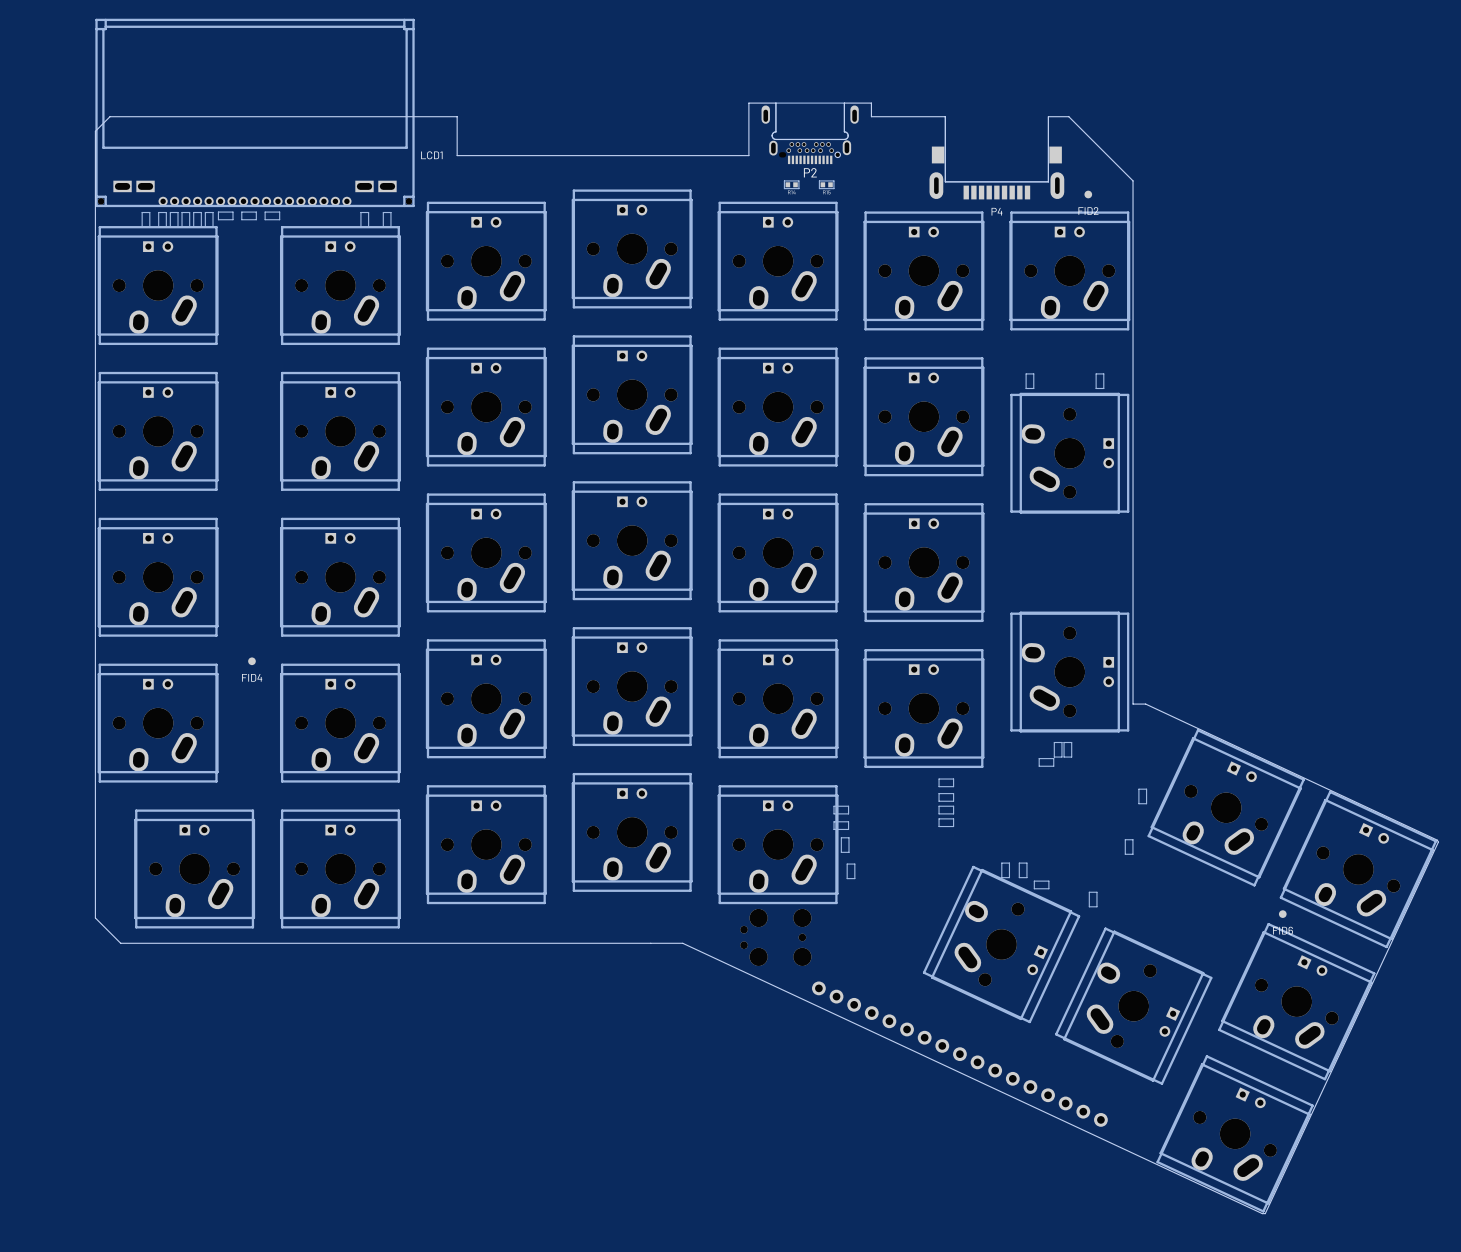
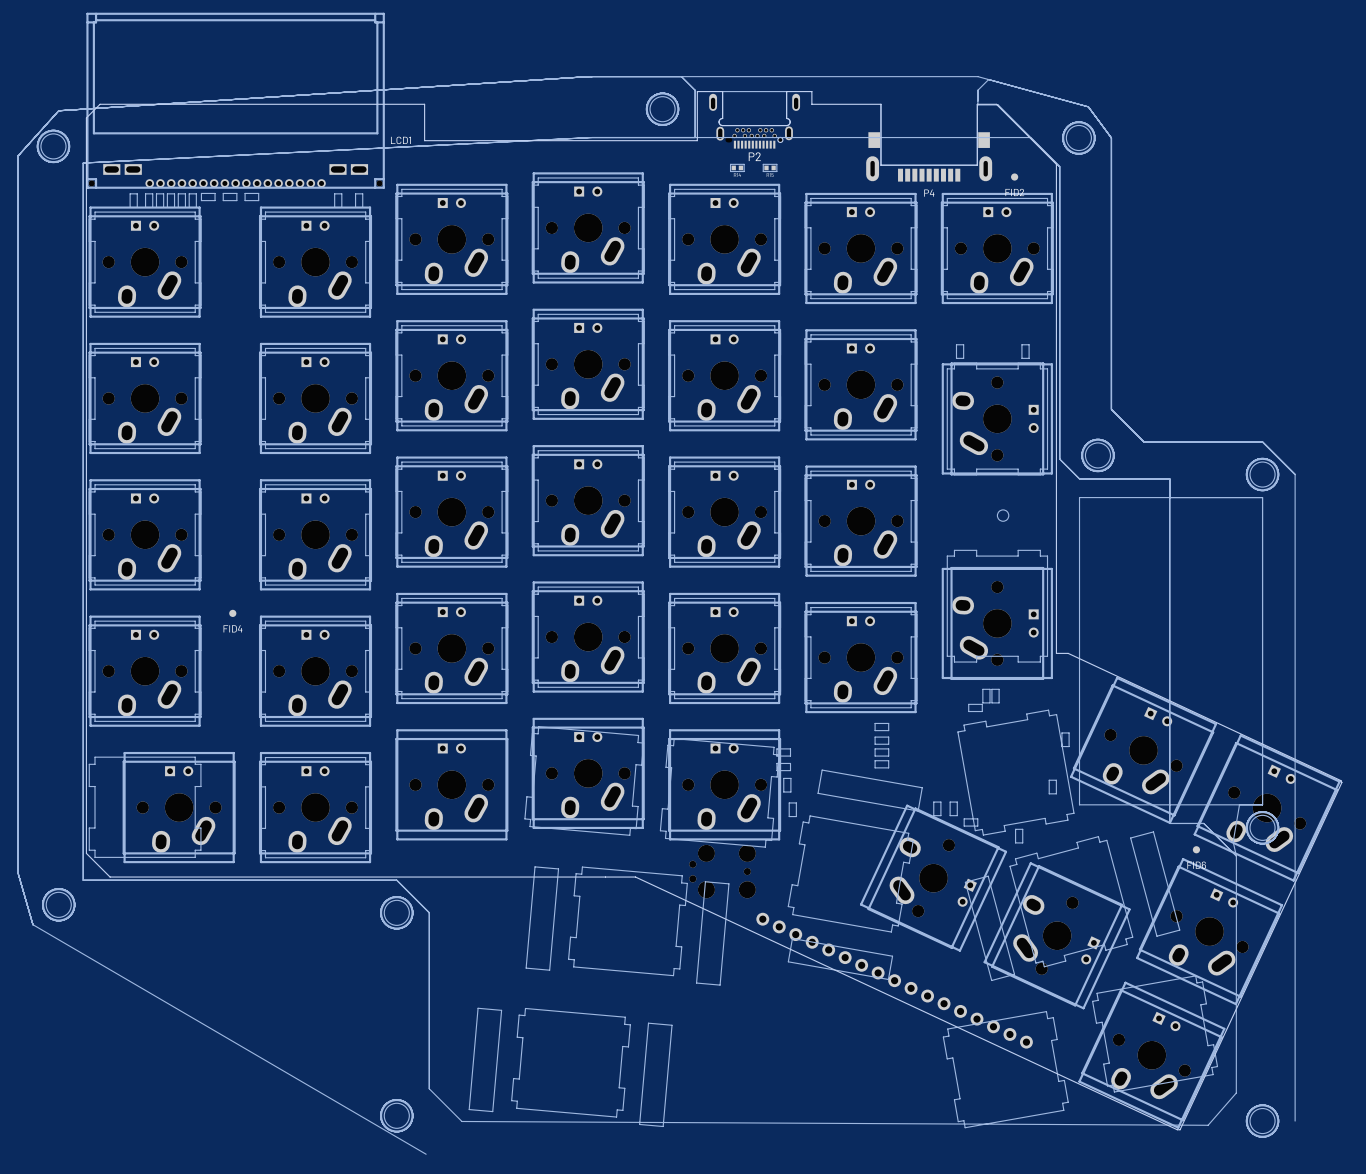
line: none -> (681, 76) (695, 90) (695, 137)
line: none -> (988, 79) (977, 90)
line: none -> (977, 90) (977, 101)
line: none -> (977, 90) (977, 104) (997, 104) (1059, 166) (1059, 459) (1079, 478) (1169, 478) (1169, 823) (1203, 823) (1236, 856)
drawing: none -> [646, 92, 680, 126]
drawing: none -> [1062, 121, 1096, 155]
drawing: none -> [37, 129, 70, 163]
line: none -> (1030, 137) (591, 137) (83, 163) (83, 880) (396, 880) (429, 912) (429, 1088) (461, 1121) (1208, 1125) (1236, 1093) (1236, 856)
line: none -> (538, 177) (538, 185) (532, 185) (532, 207) (538, 207) (538, 248) (532, 248) (532, 271) (538, 271) (538, 278) (638, 278) (638, 271) (644, 271) (644, 248) (638, 248) (638, 207) (644, 207) (644, 185) (638, 185) (638, 177) (538, 177)
line: none -> (401, 189) (502, 189) (502, 196) (507, 196) (507, 218) (502, 218) (502, 260) (507, 260) (507, 282) (502, 282) (502, 289) (401, 289) (401, 282) (396, 282) (396, 260) (401, 260) (401, 218) (396, 218) (396, 196) (401, 196) (401, 189)
line: none -> (674, 189) (674, 196) (668, 196) (668, 218) (674, 218) (674, 260) (668, 260) (668, 282) (674, 282) (674, 289) (774, 289) (774, 282) (780, 282) (780, 260) (774, 260) (774, 218) (780, 218) (780, 196) (774, 196) (774, 189) (674, 189)
line: none -> (810, 198) (911, 198) (911, 205) (916, 205) (916, 227) (911, 227) (911, 269) (916, 269) (916, 291) (911, 291) (911, 298) (810, 298) (810, 291) (805, 291) (805, 269) (810, 269) (810, 227) (805, 227) (805, 205) (810, 205) (810, 198)
line: none -> (947, 198) (1047, 198) (1047, 205) (1053, 205) (1053, 227) (1047, 227) (1047, 269) (1053, 269) (1053, 291) (1047, 291) (1047, 298) (947, 298) (947, 291) (941, 291) (941, 269) (947, 269) (947, 227) (941, 227) (941, 205) (947, 205) (947, 198)
line: none -> (95, 212) (95, 219) (89, 219) (89, 241) (95, 241) (95, 282) (89, 282) (89, 305) (95, 305) (95, 312) (195, 312) (195, 305) (200, 305) (200, 282) (195, 282) (195, 241) (200, 241) (200, 219) (195, 219) (195, 212) (95, 212)
line: none -> (265, 212) (265, 219) (259, 219) (259, 241) (265, 241) (265, 282) (259, 282) (259, 305) (265, 305) (265, 312) (365, 312) (365, 305) (371, 305) (371, 282) (365, 282) (365, 241) (371, 241) (371, 219) (365, 219) (365, 212) (265, 212)
line: none -> (538, 314) (538, 321) (532, 321) (532, 343) (538, 343) (538, 385) (532, 385) (532, 407) (538, 407) (538, 414) (638, 414) (638, 407) (644, 407) (644, 385) (638, 385) (638, 343) (644, 343) (644, 321) (638, 321) (638, 314) (538, 314)
line: none -> (401, 325) (502, 325) (502, 332) (507, 332) (507, 355) (502, 355) (502, 396) (507, 396) (507, 418) (502, 418) (502, 425) (401, 425) (401, 418) (396, 418) (396, 396) (401, 396) (401, 355) (396, 355) (396, 332) (401, 332) (401, 325)
line: none -> (674, 325) (674, 332) (668, 332) (668, 355) (674, 355) (674, 396) (668, 396) (668, 418) (674, 418) (674, 425) (774, 425) (774, 418) (780, 418) (780, 396) (774, 396) (774, 355) (780, 355) (780, 332) (774, 332) (774, 325) (674, 325)
line: none -> (810, 334) (810, 341) (805, 341) (805, 364) (810, 364) (810, 405) (805, 405) (805, 427) (810, 427) (810, 435) (911, 435) (911, 427) (916, 427) (916, 405) (911, 405) (911, 364) (916, 364) (916, 341) (911, 341) (911, 334) (810, 334)
line: none -> (95, 348) (95, 355) (89, 355) (89, 377) (95, 377) (95, 419) (89, 419) (89, 441) (95, 441) (95, 448) (195, 448) (195, 441) (200, 441) (200, 419) (195, 419) (195, 377) (200, 377) (200, 355) (195, 355) (195, 348) (95, 348)
line: none -> (265, 348) (265, 355) (259, 355) (259, 377) (265, 377) (265, 419) (259, 419) (259, 441) (265, 441) (265, 448) (365, 448) (365, 441) (371, 441) (371, 419) (365, 419) (365, 377) (371, 377) (371, 355) (365, 355) (365, 348) (265, 348)
line: none -> (954, 363) (954, 368) (947, 368) (947, 469) (954, 469) (954, 474) (976, 474) (976, 469) (1018, 469) (1018, 474) (1040, 474) (1040, 469) (1047, 469) (1047, 368) (1040, 368) (1040, 363) (1018, 363) (1018, 368) (976, 368) (976, 363) (954, 363)
drawing: none -> [1081, 438, 1115, 472]
line: none -> (538, 450) (538, 457) (532, 457) (532, 480) (538, 480) (538, 521) (532, 521) (532, 543) (538, 543) (538, 550) (638, 550) (638, 543) (644, 543) (644, 521) (638, 521) (638, 480) (644, 480) (644, 457) (638, 457) (638, 450) (538, 450)
drawing: none -> [1246, 458, 1280, 492]
line: none -> (401, 462) (502, 462) (502, 469) (507, 469) (507, 491) (502, 491) (502, 532) (507, 532) (507, 555) (502, 555) (502, 562) (401, 562) (401, 555) (396, 555) (396, 532) (401, 532) (401, 491) (396, 491) (396, 469) (401, 469) (401, 462)
line: none -> (674, 462) (674, 469) (668, 469) (668, 491) (674, 491) (674, 532) (668, 532) (668, 555) (674, 555) (674, 562) (774, 562) (774, 555) (780, 555) (780, 532) (774, 532) (774, 491) (780, 491) (780, 469) (774, 469) (774, 462) (674, 462)
line: none -> (810, 471) (810, 478) (805, 478) (805, 500) (810, 500) (810, 542) (805, 542) (805, 564) (810, 564) (810, 571) (911, 571) (911, 564) (916, 564) (916, 542) (911, 542) (911, 500) (916, 500) (916, 478) (911, 478) (911, 471) (810, 471)
line: none -> (95, 484) (95, 491) (89, 491) (89, 514) (95, 514) (95, 555) (89, 555) (89, 577) (95, 577) (95, 585) (195, 585) (195, 577) (200, 577) (200, 555) (195, 555) (195, 514) (200, 514) (200, 491) (195, 491) (195, 484) (95, 484)
line: none -> (265, 484) (265, 491) (259, 491) (259, 514) (265, 514) (265, 555) (259, 555) (259, 577) (265, 577) (265, 585) (365, 585) (365, 577) (371, 577) (371, 555) (365, 555) (365, 514) (371, 514) (371, 491) (365, 491) (365, 484) (265, 484)
line: none -> (1079, 497) (1079, 804) (1262, 804) (1262, 497) (1079, 497)
drawing: none -> [997, 509, 1010, 522]
line: none -> (954, 550) (954, 556) (947, 556) (947, 656) (954, 656) (954, 662) (976, 662) (976, 656) (1018, 656) (1018, 662) (1040, 662) (1040, 656) (1047, 656) (1047, 556) (1040, 556) (1040, 550) (1018, 550) (1018, 556) (976, 556) (976, 550) (954, 550)
line: none -> (538, 587) (538, 594) (532, 594) (532, 616) (538, 616) (538, 657) (532, 657) (532, 680) (538, 680) (538, 687) (638, 687) (638, 680) (644, 680) (644, 657) (638, 657) (638, 616) (644, 616) (644, 594) (638, 594) (638, 587) (538, 587)
line: none -> (401, 598) (502, 598) (502, 605) (507, 605) (507, 627) (502, 627) (502, 669) (507, 669) (507, 691) (502, 691) (502, 698) (401, 698) (401, 691) (396, 691) (396, 669) (401, 669) (401, 627) (396, 627) (396, 605) (401, 605) (401, 598)
line: none -> (674, 598) (674, 605) (668, 605) (668, 627) (674, 627) (674, 669) (668, 669) (668, 691) (674, 691) (674, 698) (774, 698) (774, 691) (780, 691) (780, 669) (774, 669) (774, 627) (780, 627) (780, 605) (774, 605) (774, 598) (674, 598)
line: none -> (810, 607) (810, 614) (805, 614) (805, 636) (810, 636) (810, 678) (805, 678) (805, 700) (810, 700) (810, 707) (911, 707) (911, 700) (916, 700) (916, 678) (911, 678) (911, 636) (916, 636) (916, 614) (911, 614) (911, 607) (810, 607)
line: none -> (95, 621) (95, 628) (89, 628) (89, 650) (95, 650) (95, 692) (89, 692) (89, 714) (95, 714) (95, 721) (195, 721) (195, 714) (200, 714) (200, 692) (195, 692) (195, 650) (200, 650) (200, 628) (195, 628) (195, 621) (95, 621)
line: none -> (265, 621) (265, 628) (259, 628) (259, 650) (265, 650) (265, 692) (259, 692) (259, 714) (265, 714) (265, 721) (365, 721) (365, 714) (371, 714) (371, 692) (365, 692) (365, 650) (371, 650) (371, 628) (365, 628) (365, 621) (265, 621)
line: none -> (1048, 710) (1049, 715) (1056, 714) (1074, 813) (1066, 814) (1067, 820) (1046, 824) (1045, 818) (1004, 825) (1005, 831) (983, 835) (982, 829) (975, 830) (957, 731) (964, 730) (963, 725) (985, 721) (986, 726) (1027, 719) (1026, 714) (1048, 710)
line: none -> (538, 726) (538, 733) (532, 733) (530, 755) (536, 755) (532, 797) (526, 796) (524, 818) (530, 819) (529, 826) (629, 835) (630, 828) (636, 828) (638, 806) (632, 806) (636, 764) (641, 765) (643, 743) (637, 742) (638, 735) (538, 726)
line: none -> (674, 738) (673, 745) (667, 745) (665, 767) (671, 767) (668, 809) (662, 808) (660, 830) (666, 831) (665, 838) (765, 847) (765, 840) (771, 840) (773, 818) (767, 817) (771, 776) (777, 777) (779, 754) (773, 754) (774, 747) (674, 738)
line: none -> (95, 757) (195, 757) (195, 764) (200, 764) (200, 786) (195, 786) (195, 828) (200, 828) (200, 850) (195, 850) (195, 857) (95, 857) (95, 850) (89, 850) (89, 828) (95, 828) (95, 786) (89, 786) (89, 764) (95, 764) (95, 757)
line: none -> (265, 757) (265, 764) (259, 764) (259, 786) (265, 786) (265, 828) (259, 828) (259, 850) (265, 850) (265, 857) (365, 857) (365, 850) (371, 850) (371, 828) (365, 828) (365, 786) (371, 786) (371, 764) (365, 764) (365, 757) (265, 757)
line: none -> (822, 770) (818, 793) (918, 811) (922, 787) (822, 770)
line: none -> (1239, 804) (1233, 841) (1236, 856)
drawing: none -> [1246, 811, 1280, 845]
line: none -> (810, 815) (808, 822) (803, 821) (799, 843) (804, 844) (797, 885) (792, 884) (788, 906) (793, 907) (792, 914) (891, 932) (892, 924) (898, 925) (902, 904) (896, 903) (903, 862) (909, 863) (913, 841) (907, 840) (908, 833) (810, 815)
line: none -> (1153, 831) (1179, 930) (1156, 936) (1130, 838) (1153, 831)
line: none -> (1098, 836) (1099, 842) (1106, 840) (1132, 937) (1125, 939) (1127, 944) (1105, 950) (1104, 944) (1064, 955) (1065, 961) (1044, 966) (1042, 961) (1035, 963) (1010, 866) (1016, 864) (1015, 858) (1036, 853) (1038, 858) (1078, 847) (1076, 842) (1098, 836)
line: none -> (535, 866) (526, 968) (549, 970) (558, 868) (535, 866)
line: none -> (582, 867) (581, 874) (576, 873) (574, 895) (579, 896) (576, 937) (570, 937) (568, 959) (574, 959) (573, 966) (673, 975) (674, 968) (679, 969) (681, 946) (676, 946) (679, 905) (685, 905) (687, 883) (681, 882) (682, 875) (582, 867)
line: none -> (988, 876) (1014, 974) (991, 980) (965, 882) (988, 876)
line: none -> (705, 881) (728, 883) (720, 985) (696, 983) (705, 881)
drawing: none -> [42, 888, 76, 922]
drawing: none -> [380, 896, 414, 930]
line: none -> (792, 938) (892, 956) (888, 979) (788, 961) (792, 938)
line: none -> (1195, 975) (1196, 982) (1202, 981) (1206, 1003) (1200, 1004) (1208, 1045) (1213, 1044) (1217, 1066) (1211, 1067) (1213, 1074) (1114, 1092) (1113, 1084) (1107, 1085) (1103, 1064) (1109, 1063) (1102, 1022) (1096, 1023) (1092, 1001) (1098, 1000) (1097, 993) (1195, 975)
line: none -> (478, 1008) (469, 1109) (492, 1111) (501, 1010) (478, 1008)
line: none -> (525, 1008) (524, 1015) (519, 1015) (517, 1037) (522, 1037) (519, 1079) (513, 1078) (511, 1100) (517, 1101) (516, 1108) (616, 1117) (617, 1109) (622, 1110) (624, 1088) (619, 1087) (622, 1046) (628, 1046) (630, 1024) (624, 1024) (625, 1017) (525, 1008)
line: none -> (1046, 1011) (1047, 1018) (1053, 1017) (1057, 1039) (1051, 1040) (1058, 1081) (1064, 1080) (1068, 1102) (1062, 1103) (1063, 1110) (965, 1127) (963, 1120) (958, 1121) (954, 1099) (960, 1098) (952, 1057) (947, 1058) (943, 1037) (948, 1036) (947, 1029) (1046, 1011)
line: none -> (648, 1023) (672, 1025) (663, 1126) (639, 1124) (648, 1023)
drawing: none -> [380, 1099, 414, 1133]
drawing: none -> [1246, 1104, 1280, 1138]
line: none -> (1295, 1121) (1295, 474) (1262, 441) (1144, 441) (1111, 409) (1111, 138) (1088, 106) (977, 76) (588, 76) (58, 110) (17, 156) (17, 872) (32, 924) (426, 1154)

